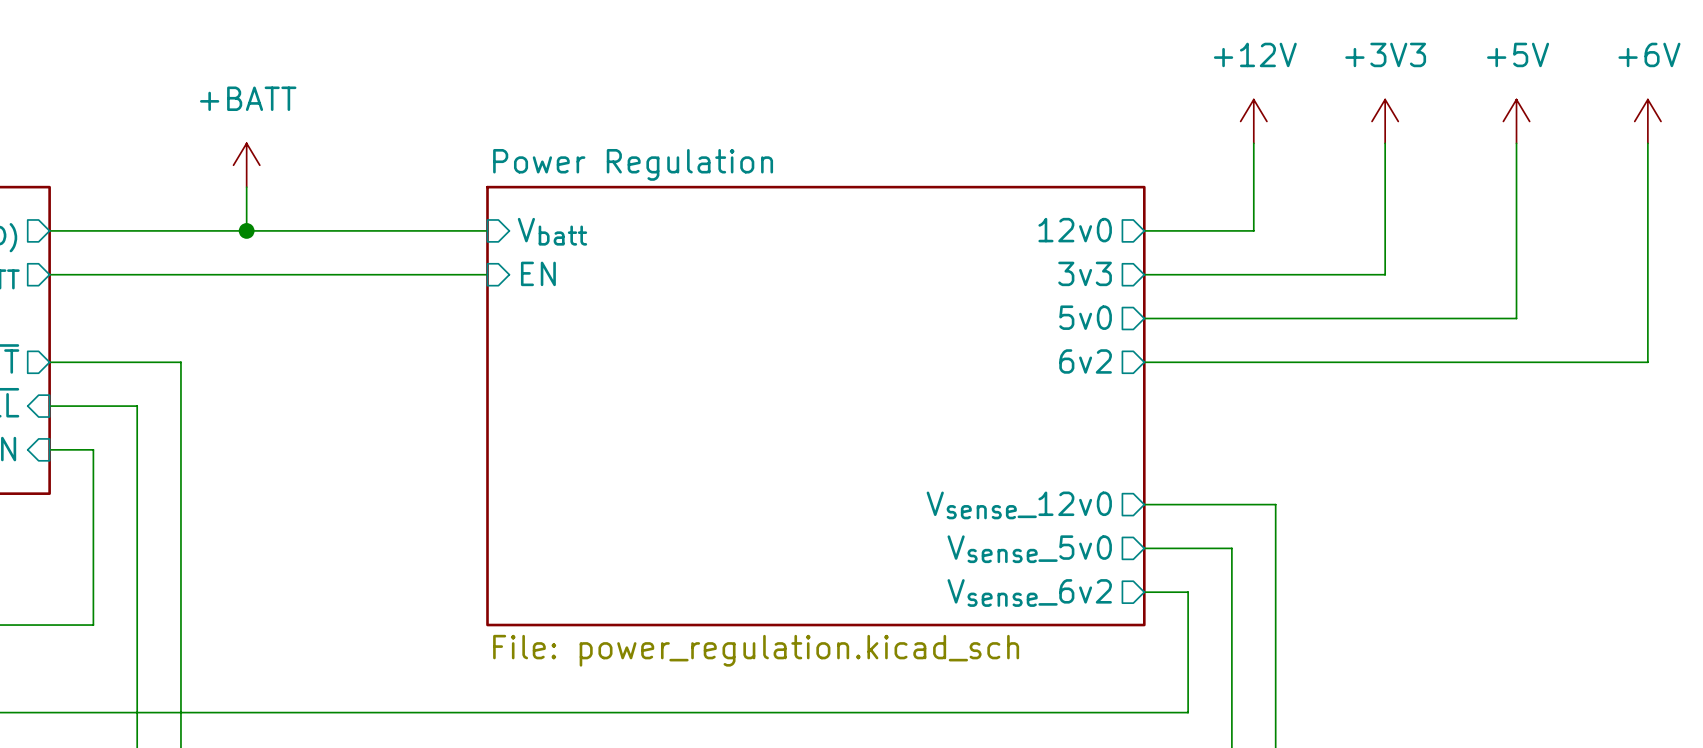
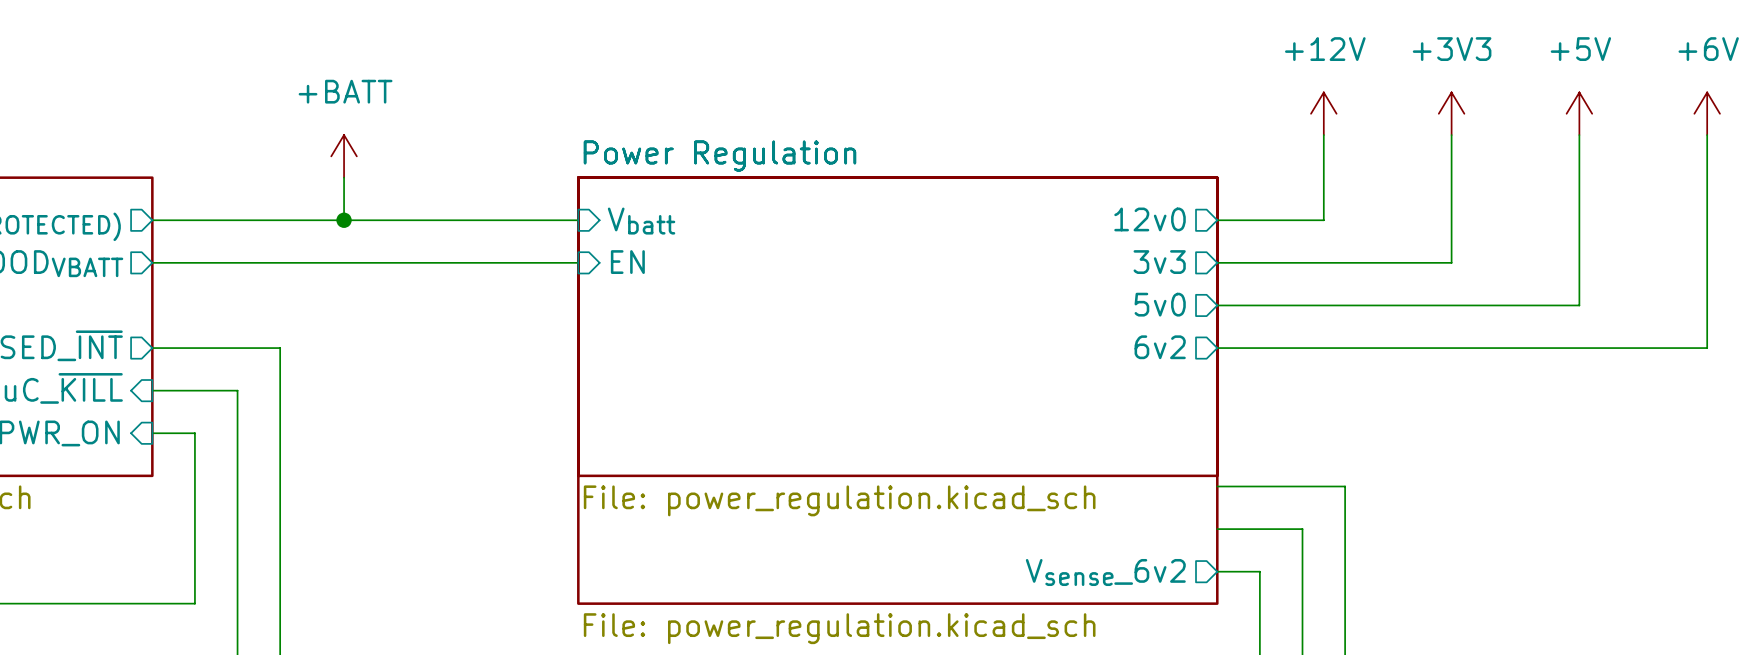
sheet Power Regulation: none -> File: power_regulation.kicad_sch (897, 326)
sheet pin: Vsense_12v0 (1019, 505) -> none
sheet pin: Vsense_5v0 (1029, 549) -> none

